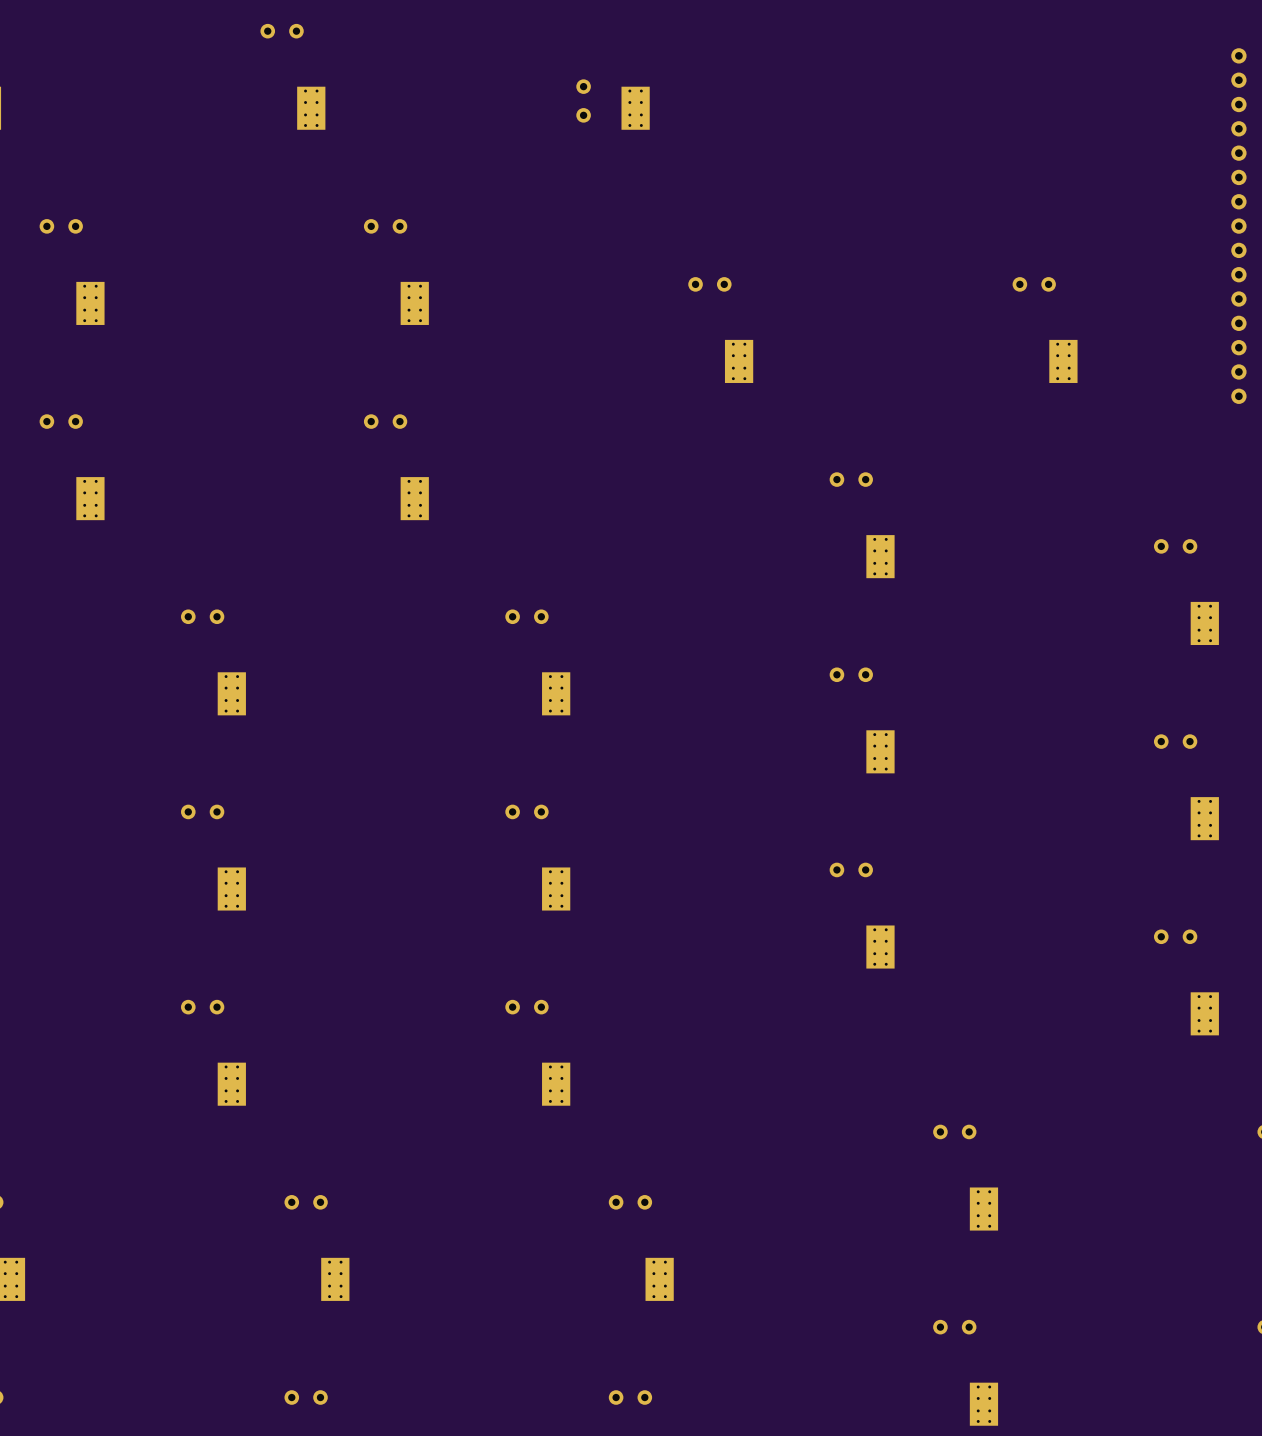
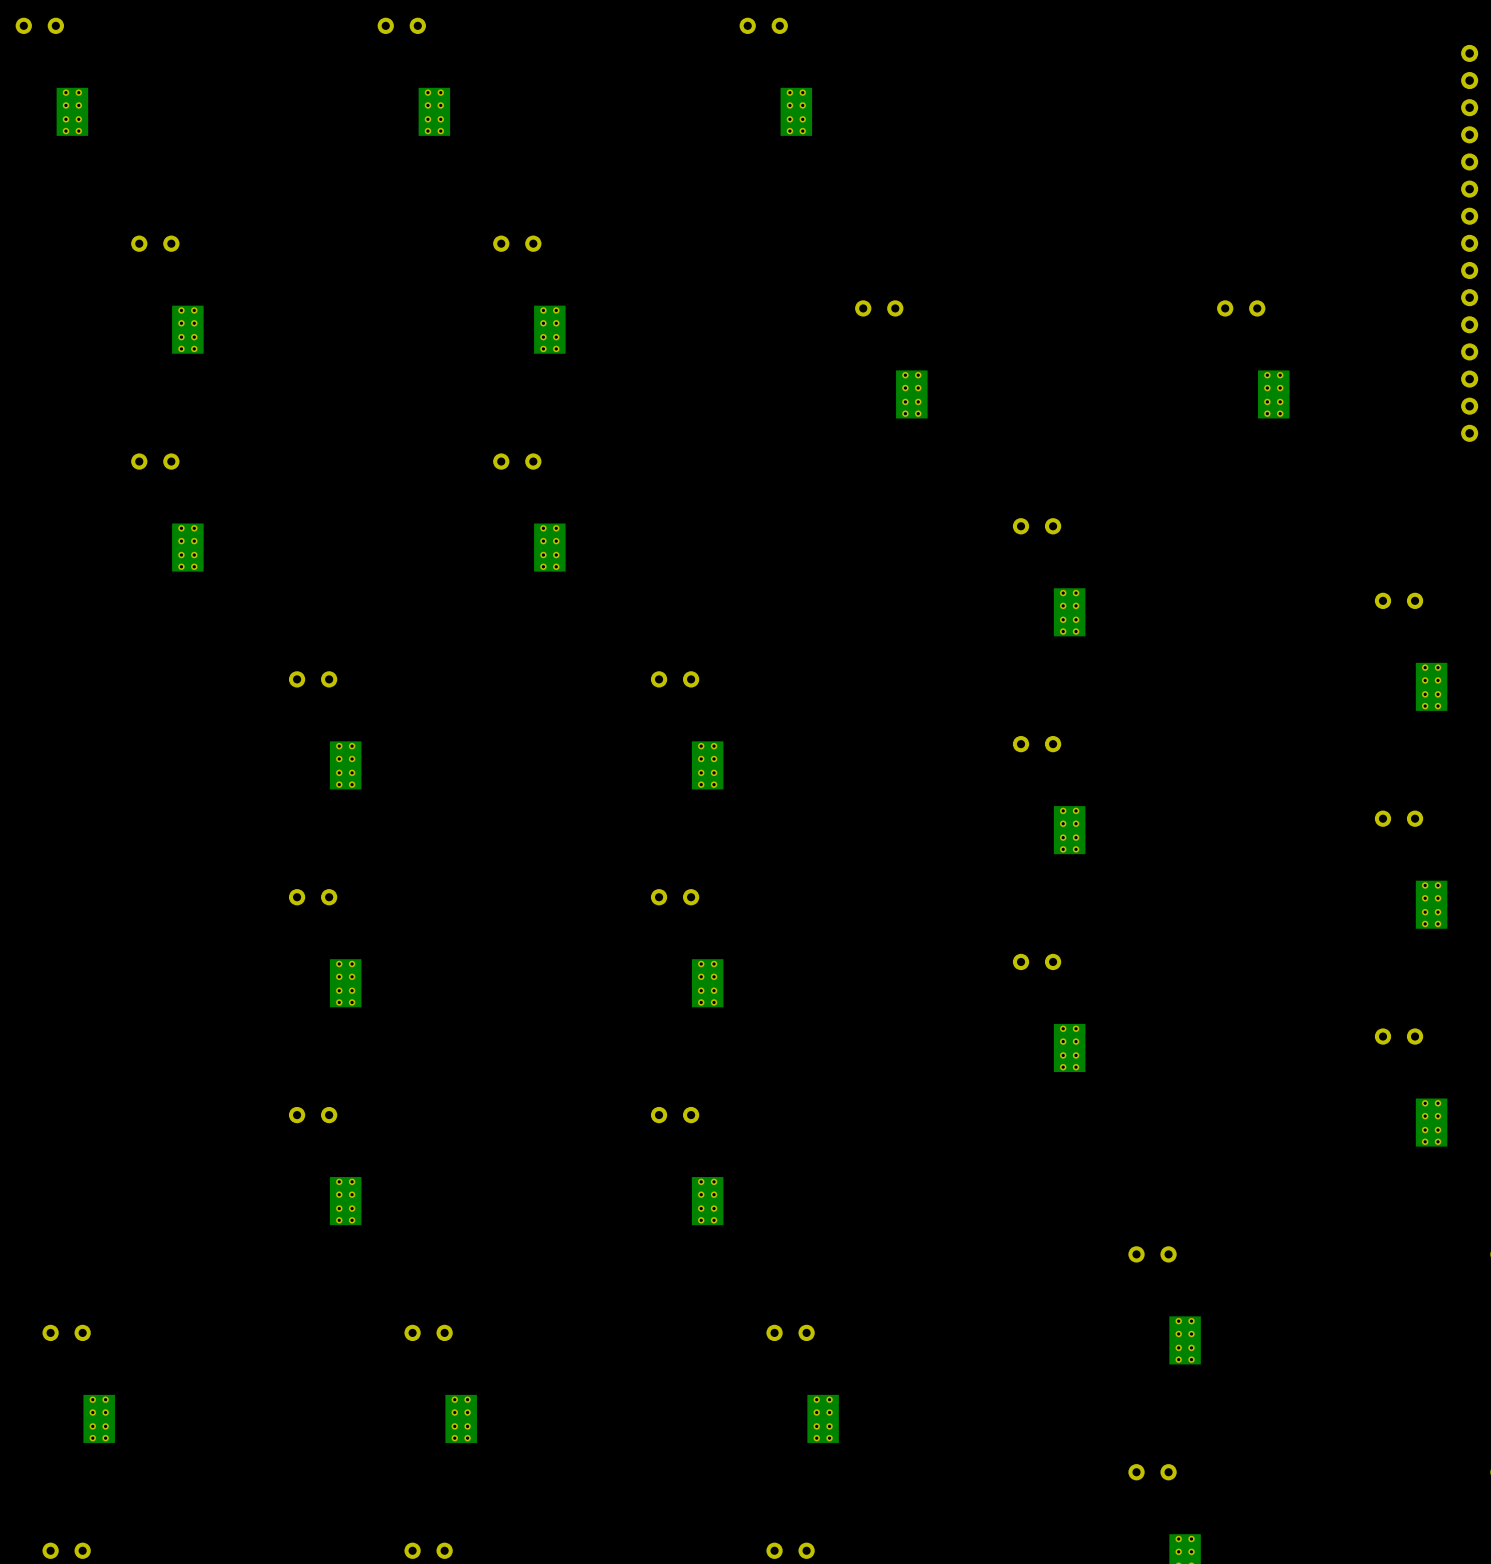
part rotation: 0° (583, 100) -> 90° clockwise (763, 25)
part position: (583, 100) -> (763, 25)

